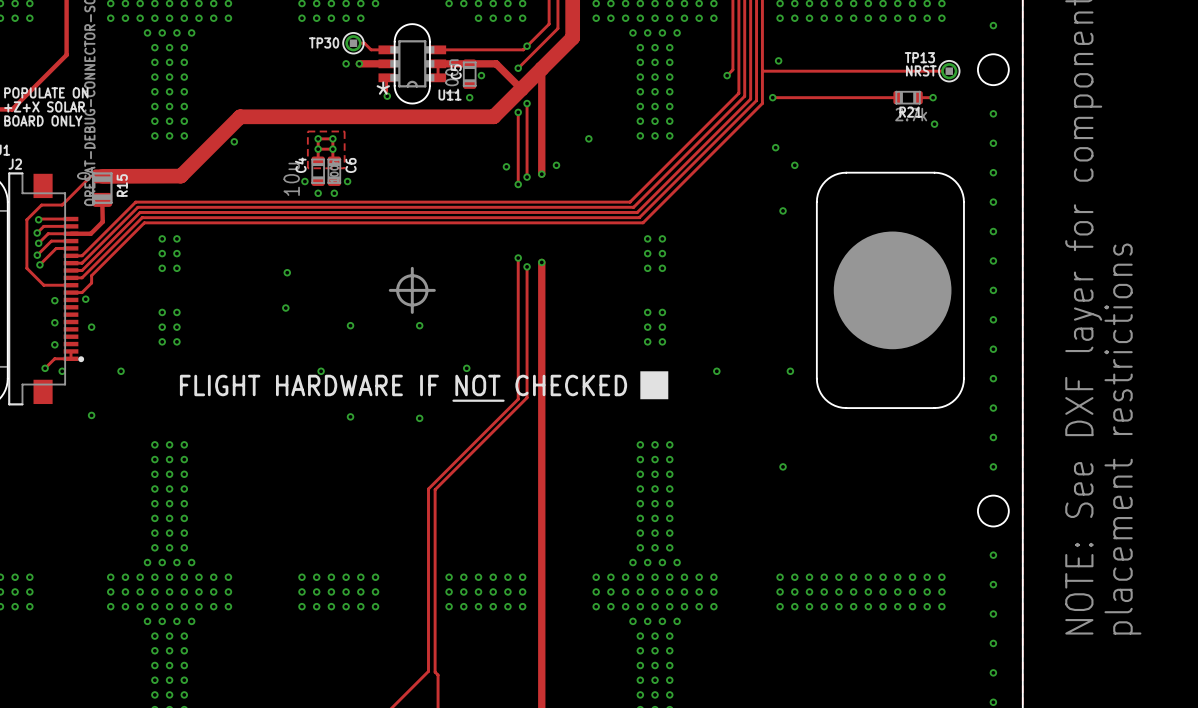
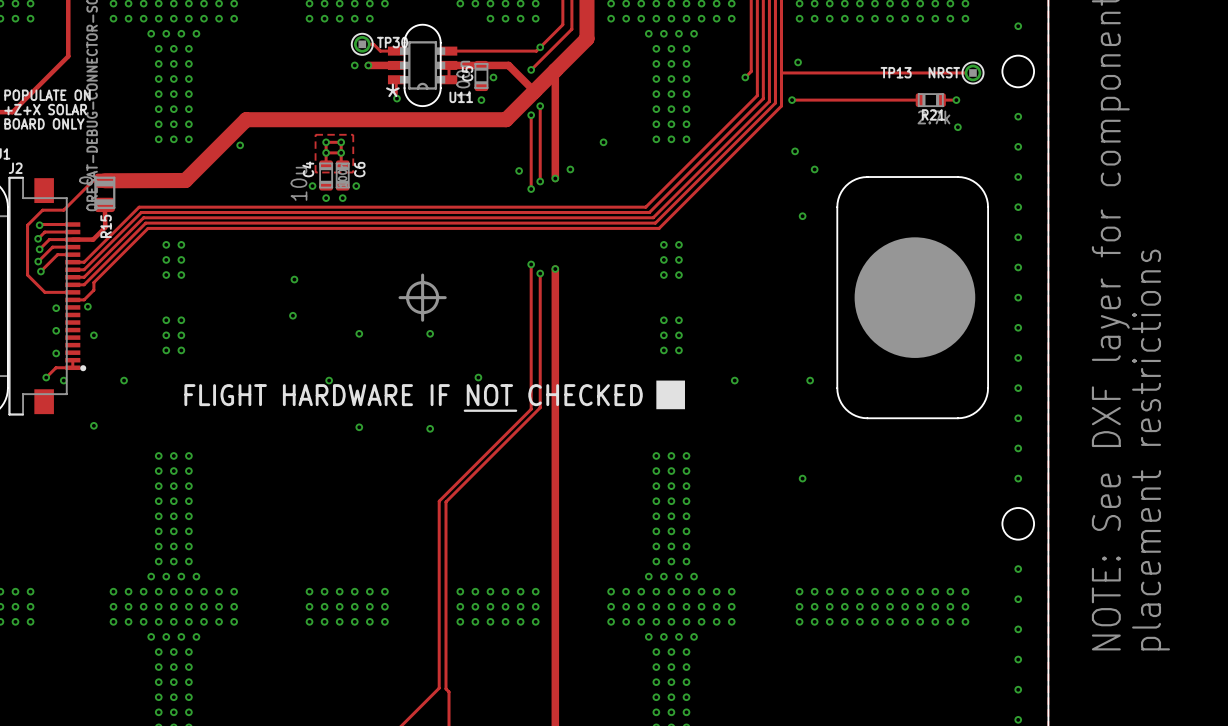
TP30 name position: TP30 (324, 42) -> TP30 (392, 42)
TP13 name position: TP13 (919, 57) -> TP13 (896, 72)
R15 name position: R15 (122, 185) -> R15 (106, 226)

